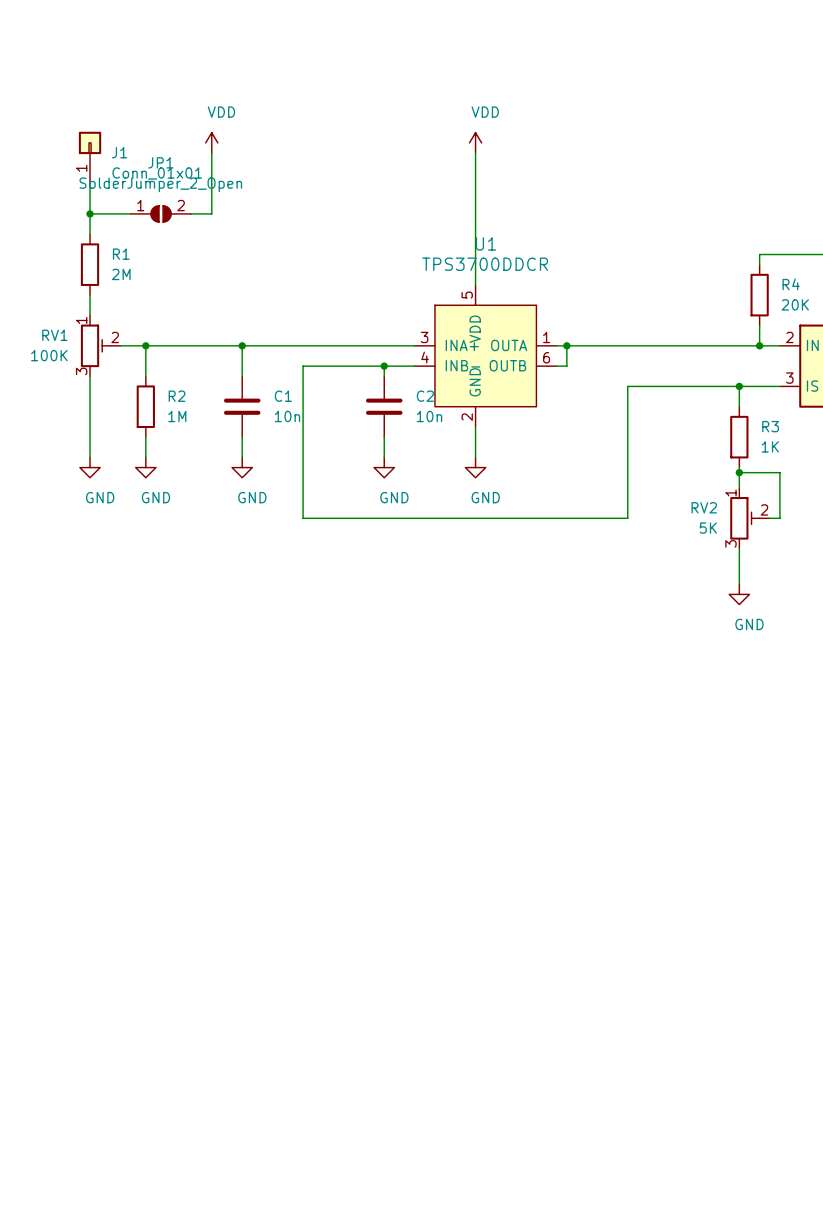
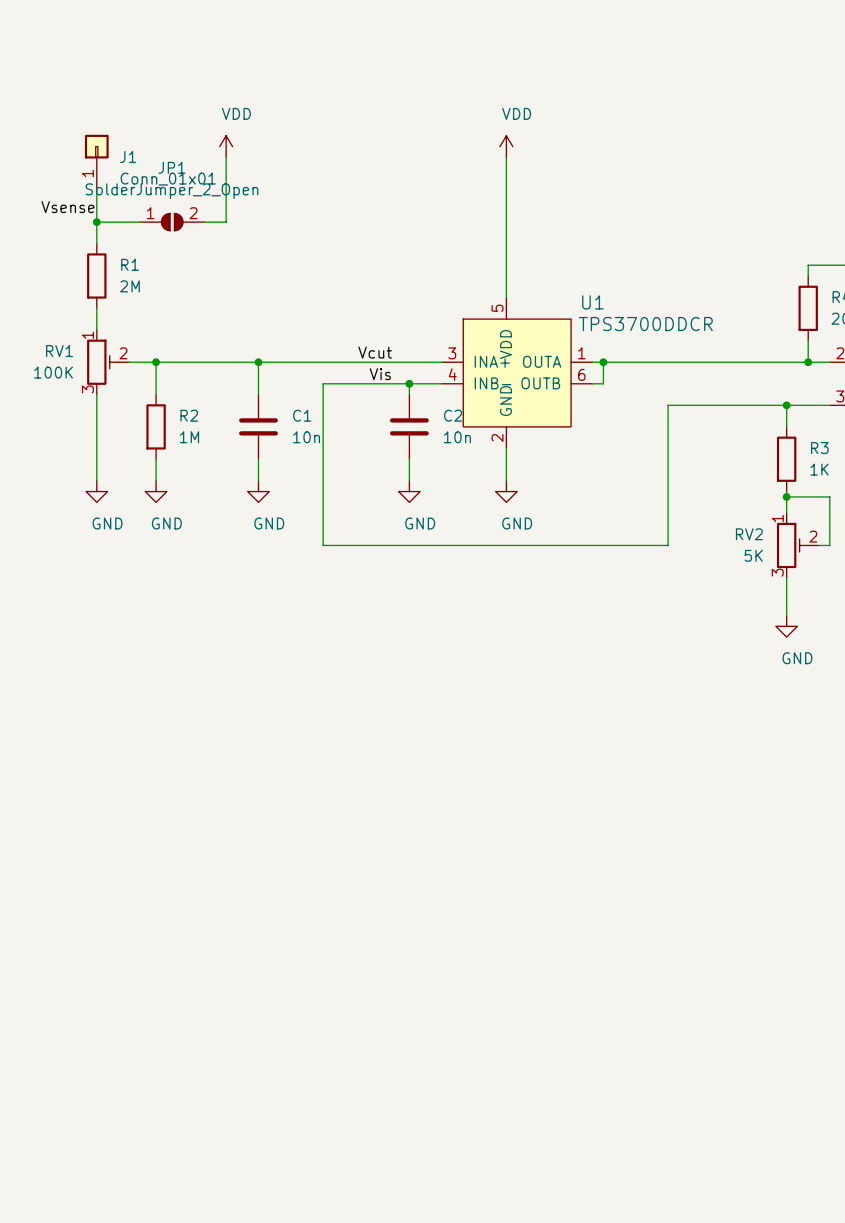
label: none -> Vsense (67, 207)
U1 name position: U1 (485, 243) -> U1 (592, 302)
U1 value position: TPS3700DDCR (485, 264) -> TPS3700DDCR (645, 324)
label: none -> Vcut (375, 352)
label: none -> Vis (380, 374)

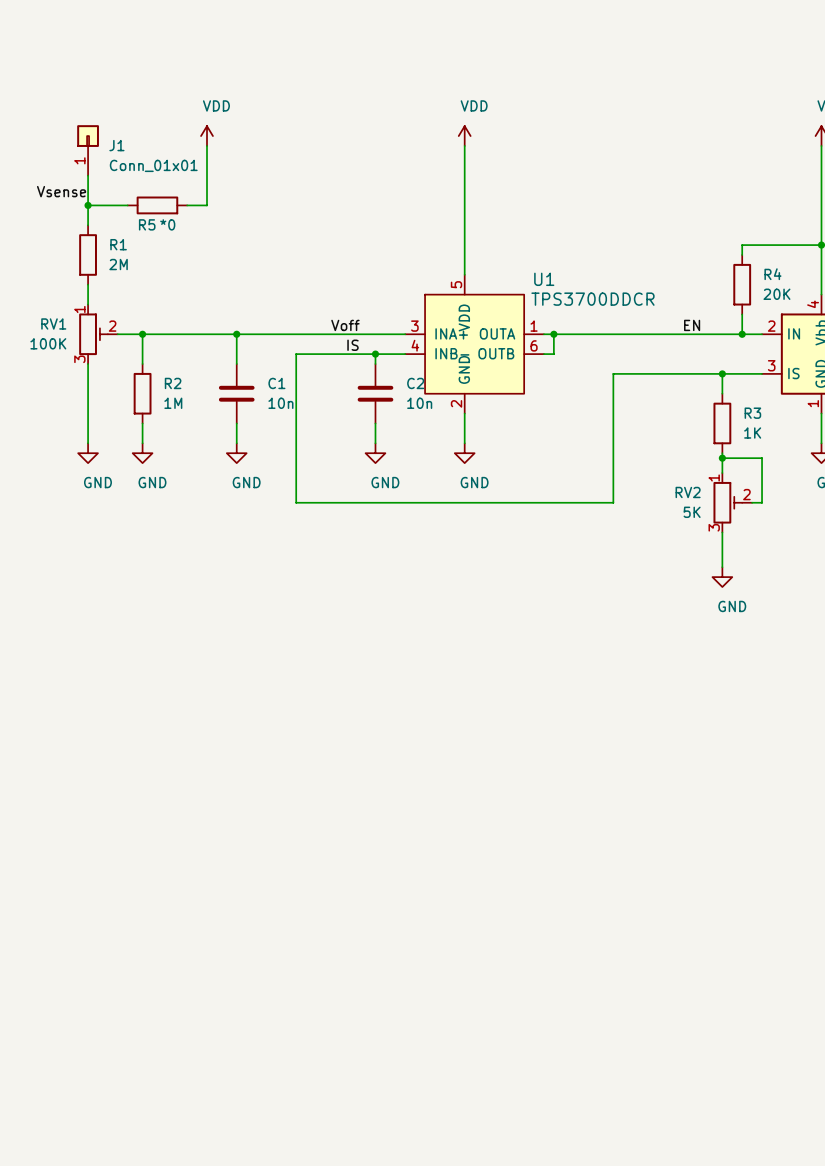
JP1: SolderJumper_2_Open (172, 222) -> none
R5: none -> *0 (157, 205)
label: Vcut (375, 352) -> Voff (345, 325)
label: none -> EN (692, 325)
label: Vis (380, 374) -> IS (352, 345)

